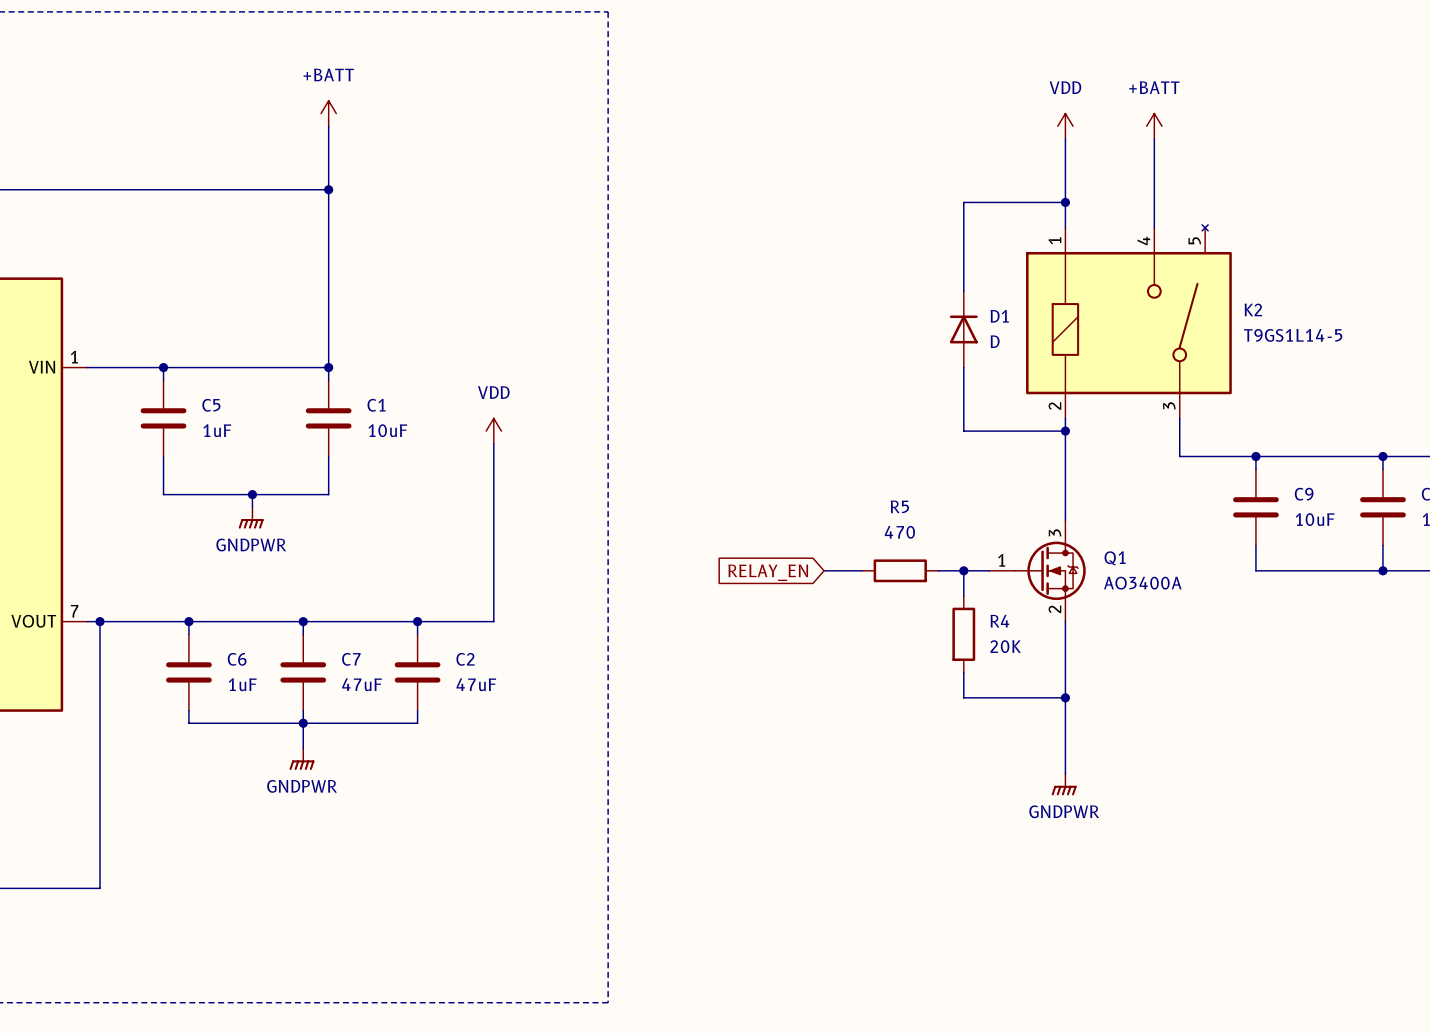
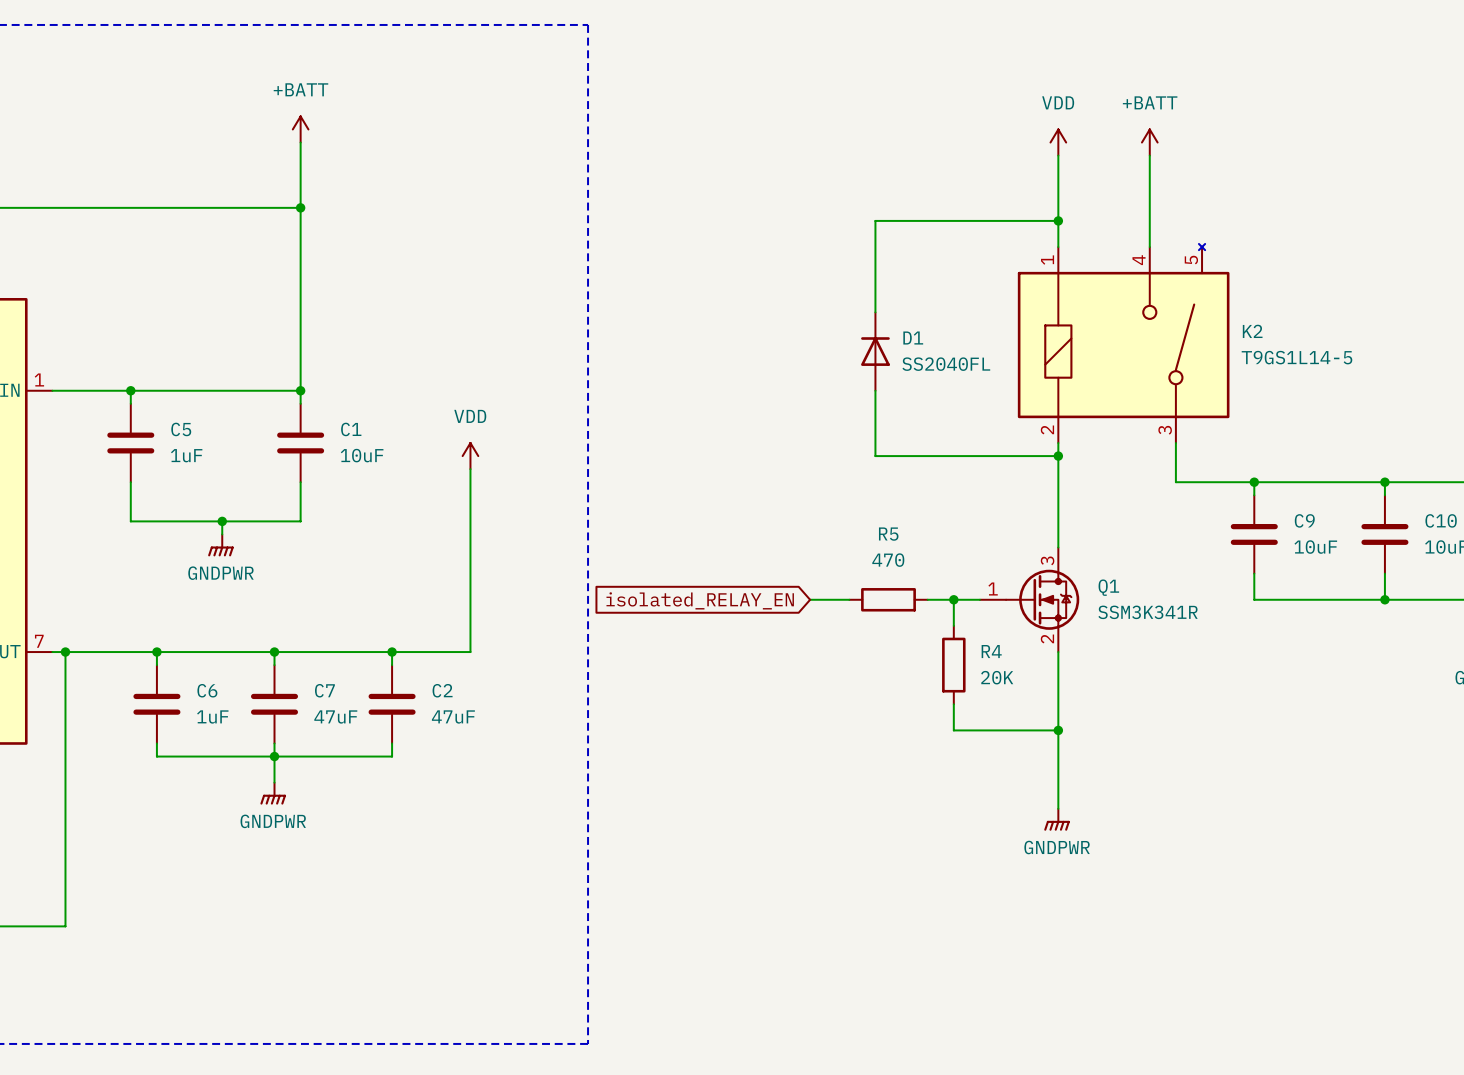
wire: (963, 202) (963, 291) -> (953, 220) (875, 220) (875, 312)
D1 position: (963, 329) -> (875, 351)
D1 value: D (995, 341) -> SS2040FL (946, 364)
wire: (963, 367) (963, 431) -> (875, 390) (875, 456) (953, 456)
global label: RELAY_EN (768, 572) -> isolated_RELAY_EN (700, 600)
Q1 value: AO3400A (1142, 583) -> SSM3K341R (1148, 612)

